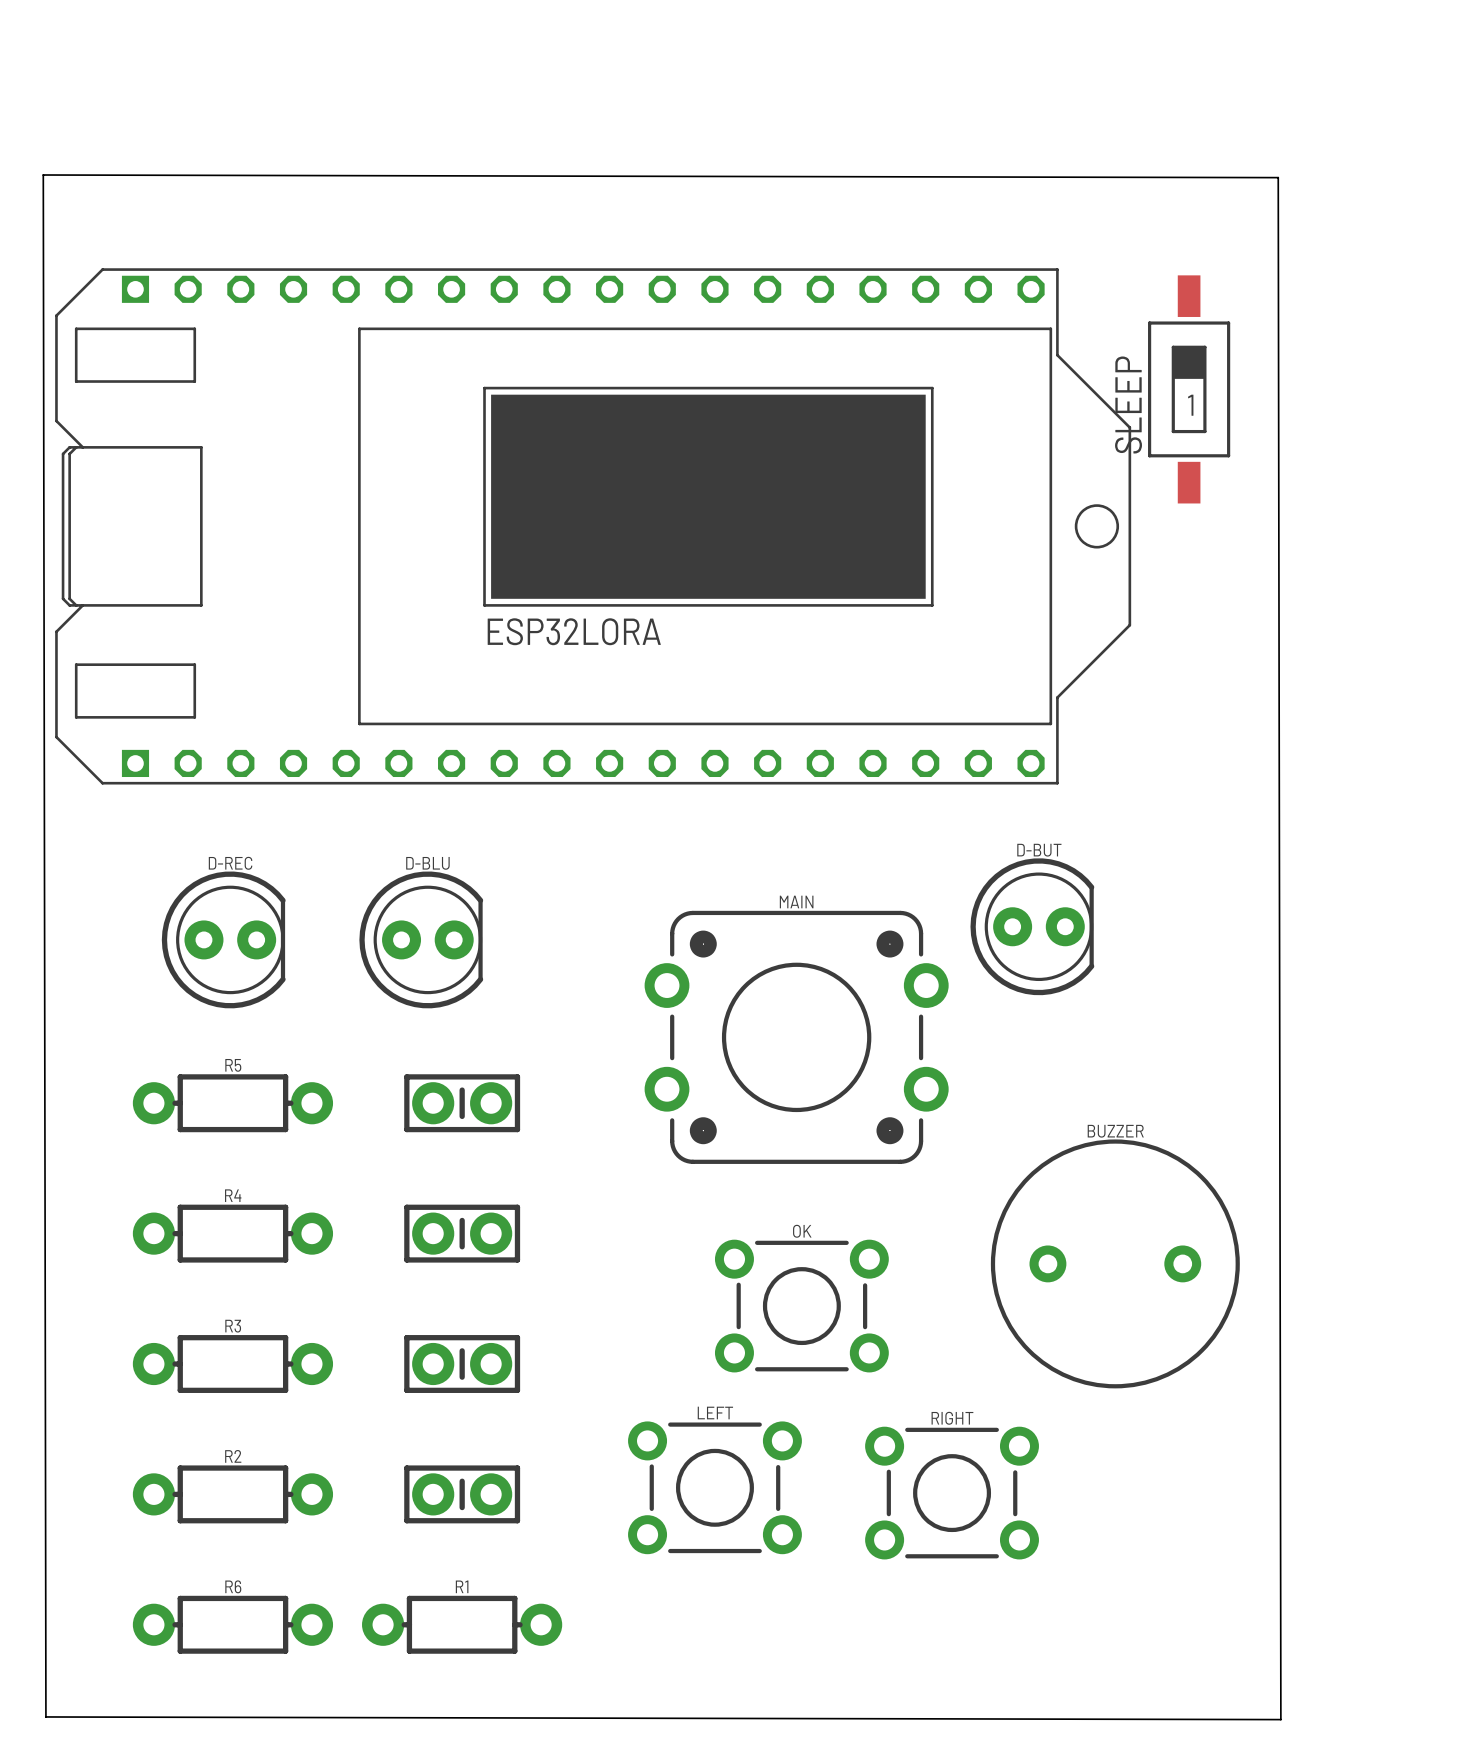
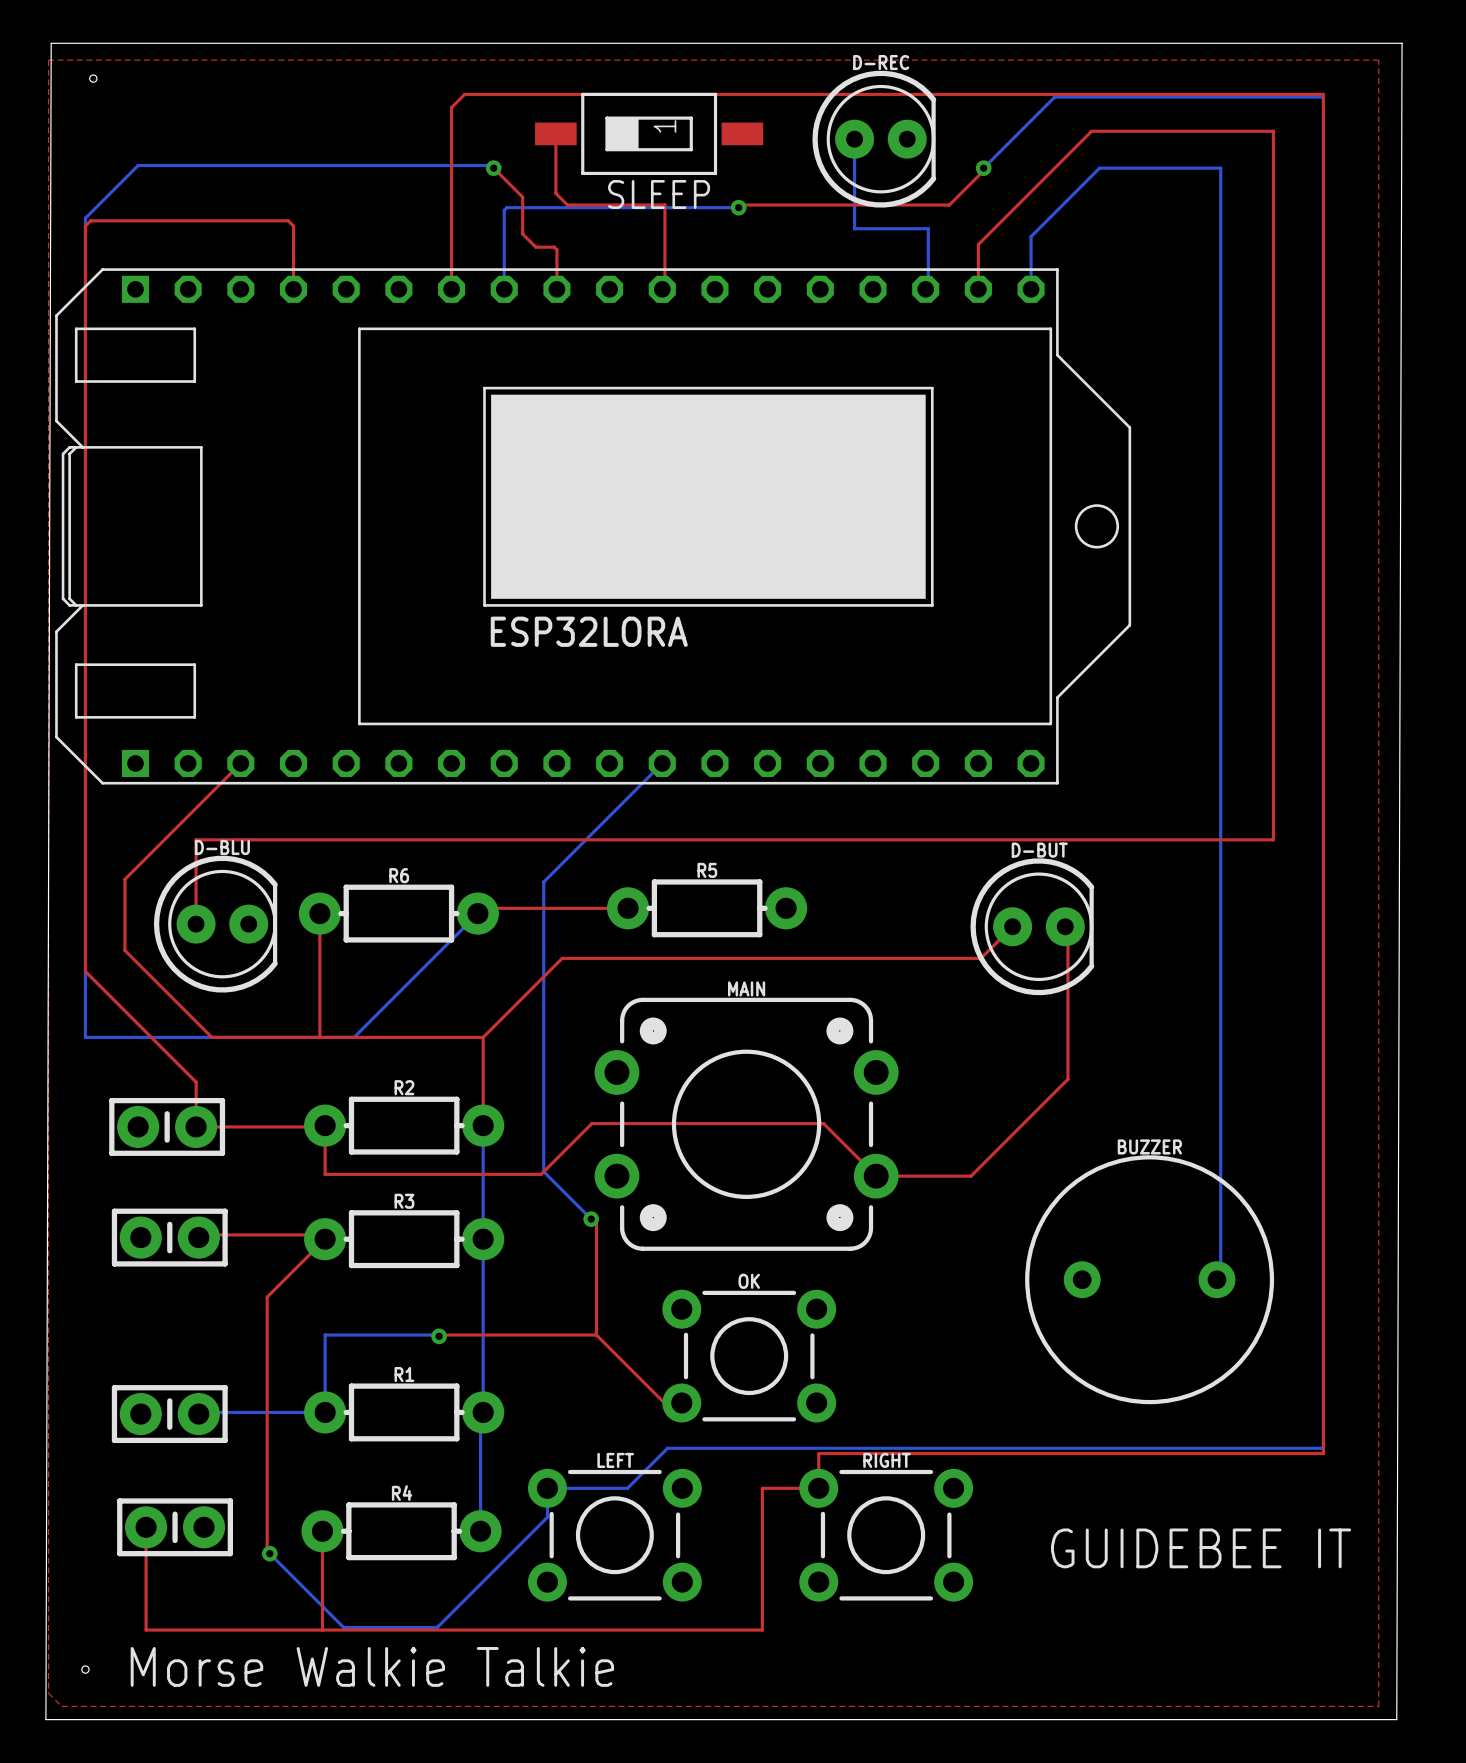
top zone outline: none -> (48, 60) (48, 1693) (61, 1706) (1378, 1706) (1378, 60) (48, 60)
hole: none -> (93, 78)
top track: none -> (555, 133) (555, 193) (567, 205) (664, 205) (664, 286) (662, 289)
SLEEP: none -> (649, 133)
bottom track: none -> (854, 139) (854, 228) (928, 228) (928, 286) (925, 289)
D-REC: none -> (874, 139)
top track: none -> (493, 168) (522, 197) (522, 234) (535, 247) (554, 247) (556, 249) (556, 289)
bottom track: none -> (493, 168) (491, 165) (138, 165) (85, 218) (85, 1037) (354, 1037) (477, 913)
via: none -> (493, 168)
top track: none -> (983, 168) (983, 170) (949, 205) (738, 205) (738, 207)
bottom track: none -> (983, 168) (1054, 97) (1323, 97) (1323, 1448) (667, 1448) (627, 1488) (547, 1488) (547, 1517) (437, 1627) (343, 1627) (269, 1553)
via: none -> (983, 168)
board edge: (43, 175) (1278, 177) (1280, 1719) (45, 1716) (43, 175) -> (51, 43) (45, 1719) (1396, 1719) (1402, 43) (51, 43)
bottom track: none -> (738, 207) (506, 207) (504, 210) (504, 289)
via: none -> (738, 207)
top track: none -> (293, 289) (293, 226) (288, 220) (90, 220) (85, 226) (85, 971) (196, 1082) (196, 1126) (325, 1125) (325, 1174) (541, 1174) (591, 1123) (823, 1123) (876, 1176) (971, 1176) (1067, 1079)
top track: none -> (451, 289) (451, 107) (464, 94) (1323, 94) (1323, 1453) (819, 1453) (818, 1488) (762, 1488) (762, 1630) (146, 1630) (146, 1527)
top track: none -> (978, 289) (978, 244) (1091, 131) (1273, 131) (1273, 839) (196, 839) (196, 924)
bottom track: none -> (1031, 289) (1031, 236) (1099, 168) (1220, 168) (1220, 1279) (1217, 1279)
SLEEP: (1189, 389) -> none
top track: none -> (240, 763) (124, 879) (124, 950) (211, 1037) (483, 1037)
bottom track: none -> (662, 763) (543, 881) (543, 1171) (591, 1219)
D-REC name: D-REC (230, 863) -> D-BLU (222, 847)
top track: none -> (628, 908) (483, 908) (477, 913)
top track: none -> (319, 913) (319, 1037)
top track: none -> (1012, 926) (981, 958) (562, 958) (483, 1037)
top track: none -> (1065, 926) (1067, 929) (1067, 1079)
D-REC position: (223, 939) -> (215, 924)
D-BLU: (421, 939) -> none
top track: none -> (483, 1037) (483, 1125)
MAIN position: (796, 1037) -> (746, 1124)
R5 position: (232, 1103) -> (707, 908)
part: (462, 1103) -> none
bottom track: none -> (483, 1125) (483, 1412) (480, 1415) (480, 1531)
part: none -> (167, 1126)
top track: none -> (591, 1219) (596, 1224) (596, 1335)
via: none -> (591, 1219)
R4 position: (232, 1233) -> (401, 1531)
part: (462, 1233) -> none
part: none -> (169, 1237)
top track: none -> (198, 1237) (201, 1234) (325, 1234) (325, 1239) (267, 1297) (267, 1551) (269, 1553)
BUZZER position: (1115, 1263) -> (1149, 1279)
OK position: (801, 1306) -> (749, 1356)
top track: none -> (596, 1335) (664, 1402) (681, 1402)
top track: none -> (596, 1335) (439, 1336)
bottom track: none -> (439, 1336) (325, 1335) (325, 1412) (200, 1412) (198, 1414)
via: none -> (439, 1336)
R3 position: (232, 1364) -> (404, 1239)
part: (462, 1364) -> none
part: none -> (169, 1414)
LEFT position: (714, 1487) -> (614, 1535)
RIGHT position: (952, 1493) -> (886, 1535)
R2 position: (232, 1494) -> (404, 1125)
part: (462, 1494) -> none
part: none -> (175, 1527)
top track: none -> (322, 1531) (322, 1630)
text: none -> GUIDEBEE IT (1201, 1548)
via: none -> (269, 1553)
R6 position: (232, 1624) -> (398, 913)
R1 position: (462, 1624) -> (404, 1412)
text: none -> Morse Walkie Talkie (372, 1666)
hole: none -> (85, 1669)

